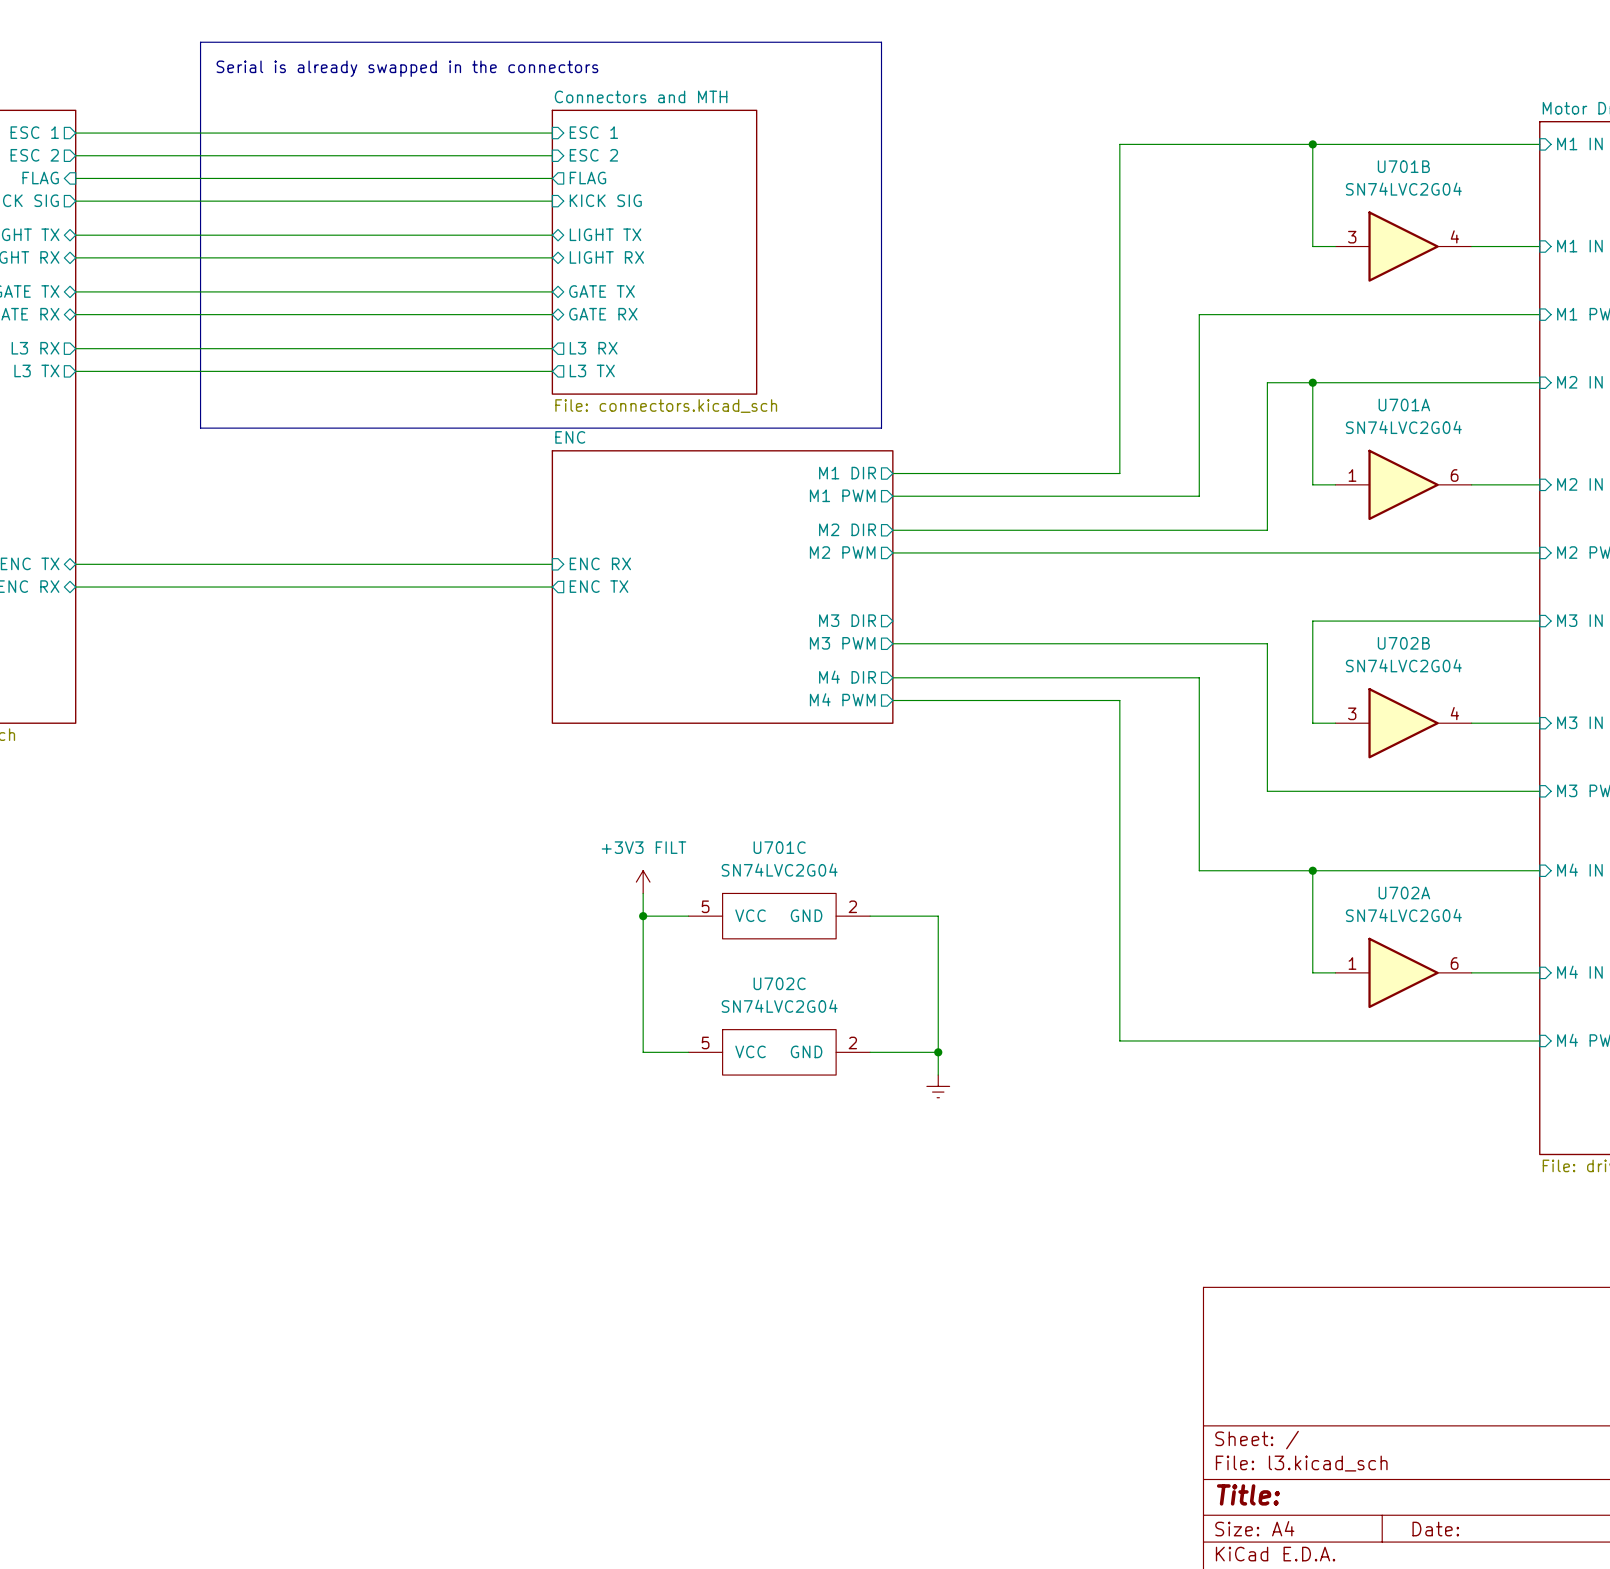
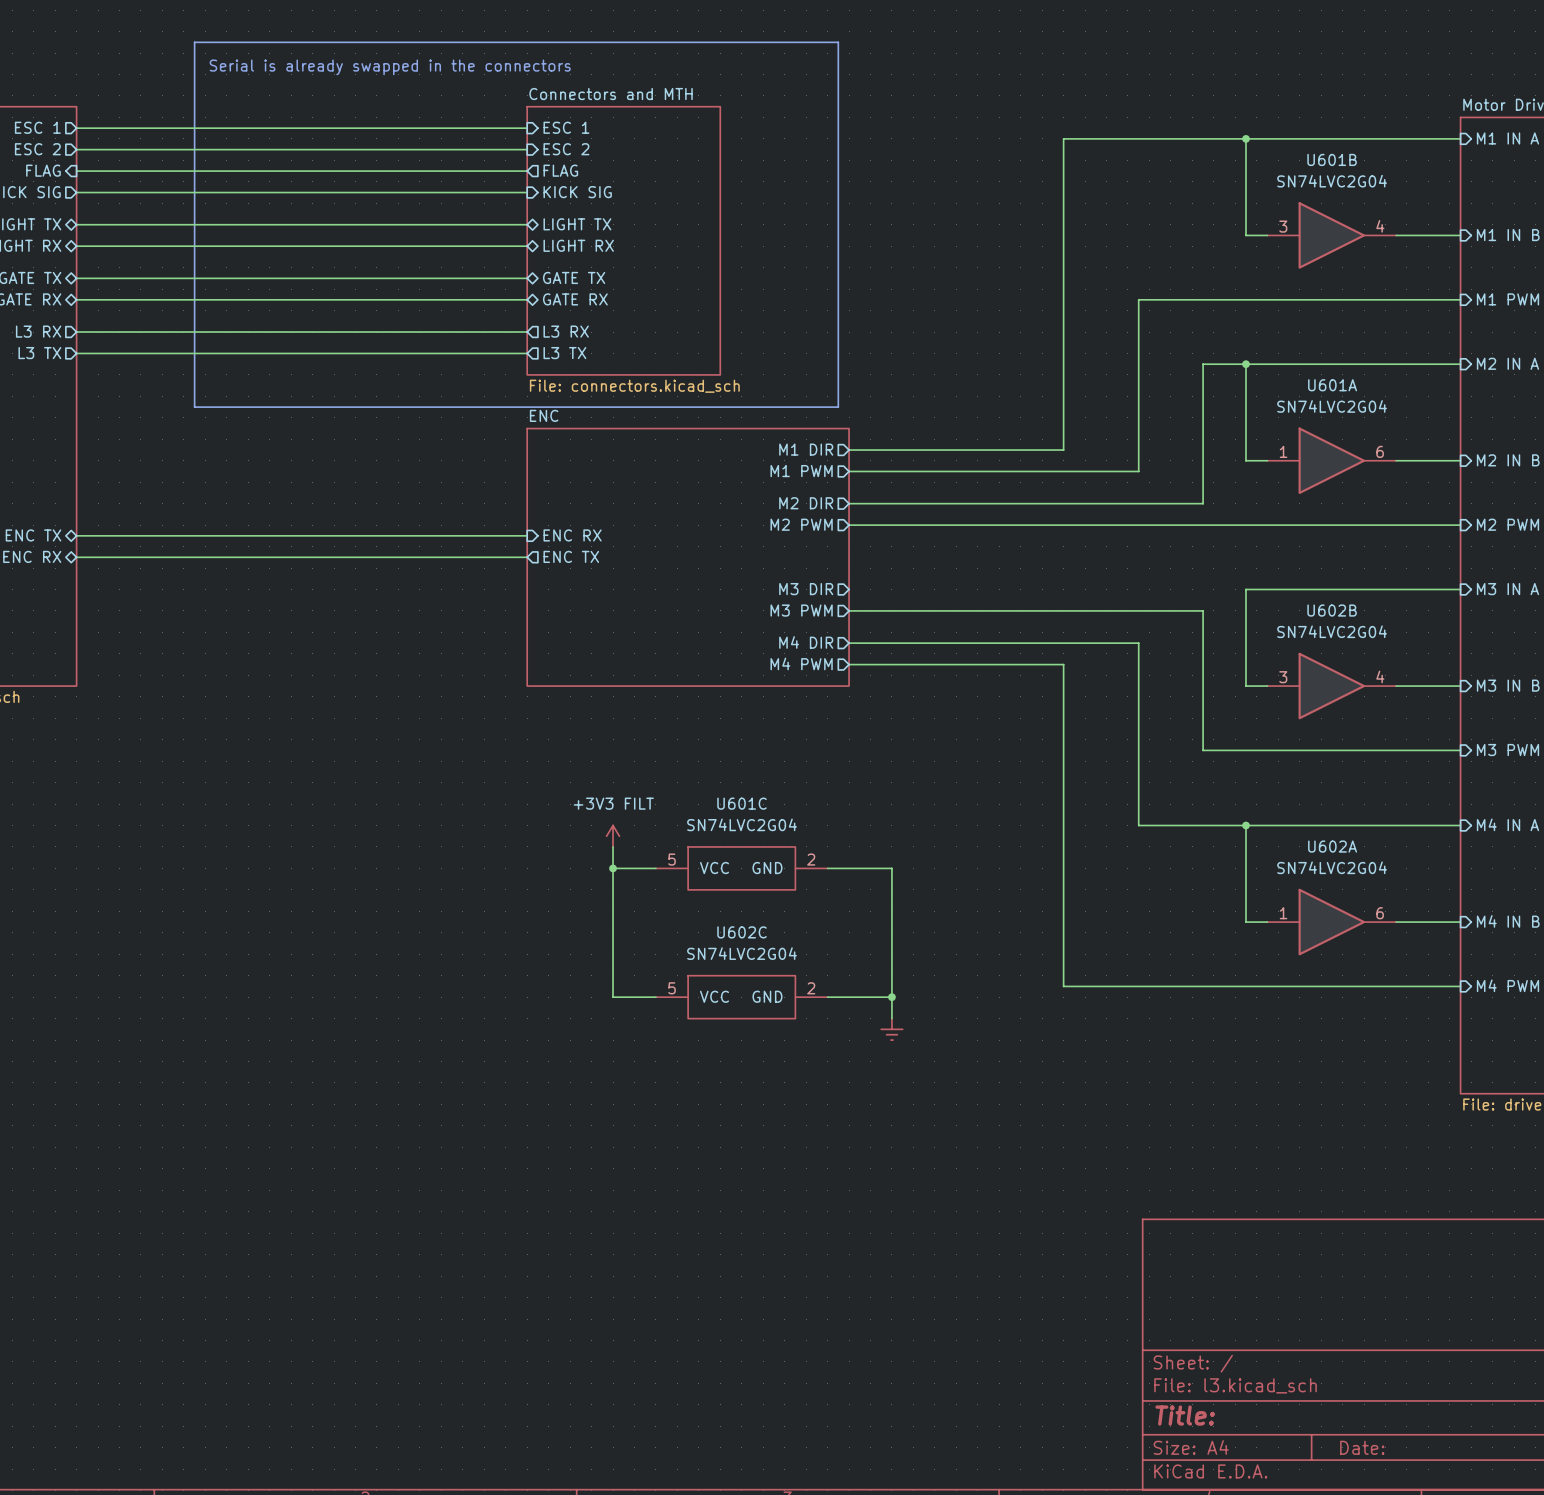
U701B name: U701B (1403, 166) -> U601B (1332, 159)
U701A name: U701A (1404, 405) -> U601A (1332, 385)
U702B name: U702B (1403, 643) -> U602B (1332, 610)
U701C name: U701C (779, 847) -> U601C (742, 803)
U702A name: U702A (1404, 893) -> U602A (1332, 846)
U702C name: U702C (779, 983) -> U602C (742, 932)

